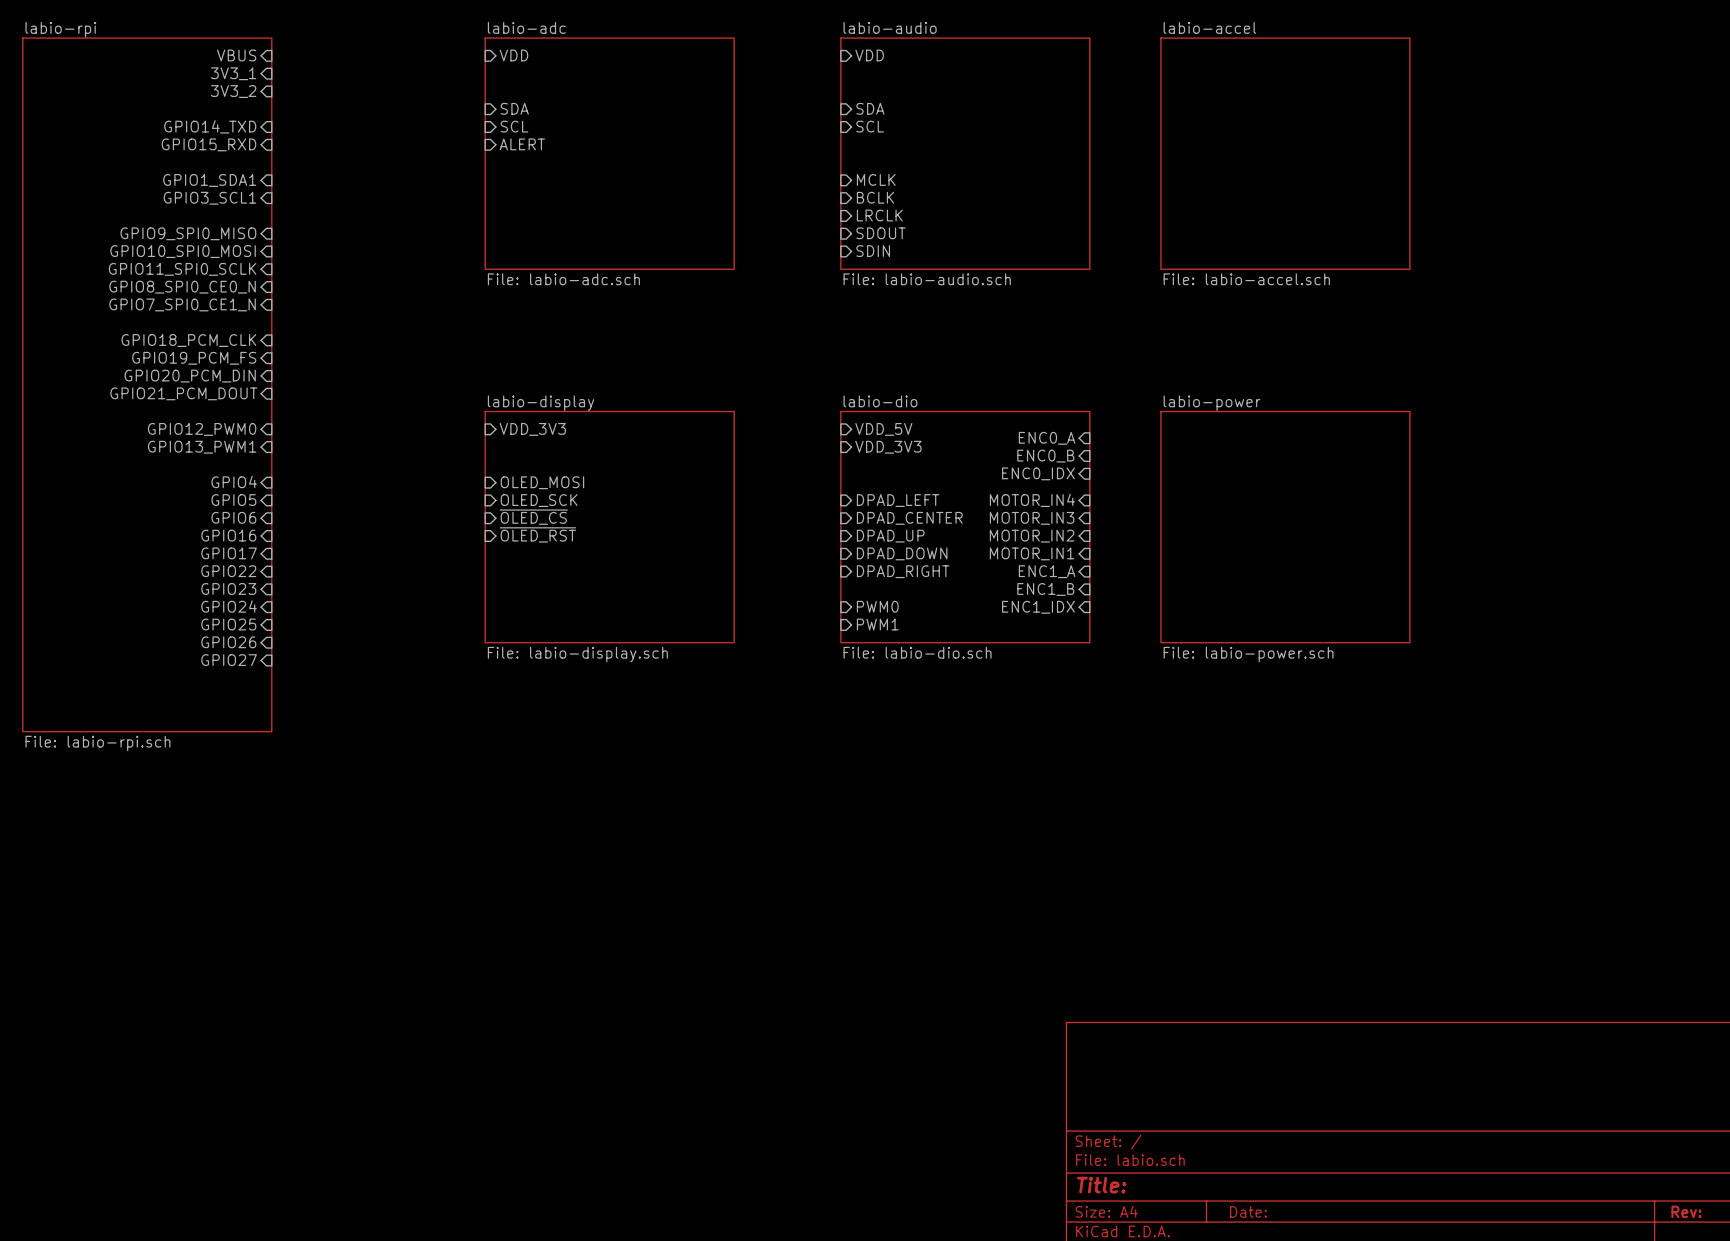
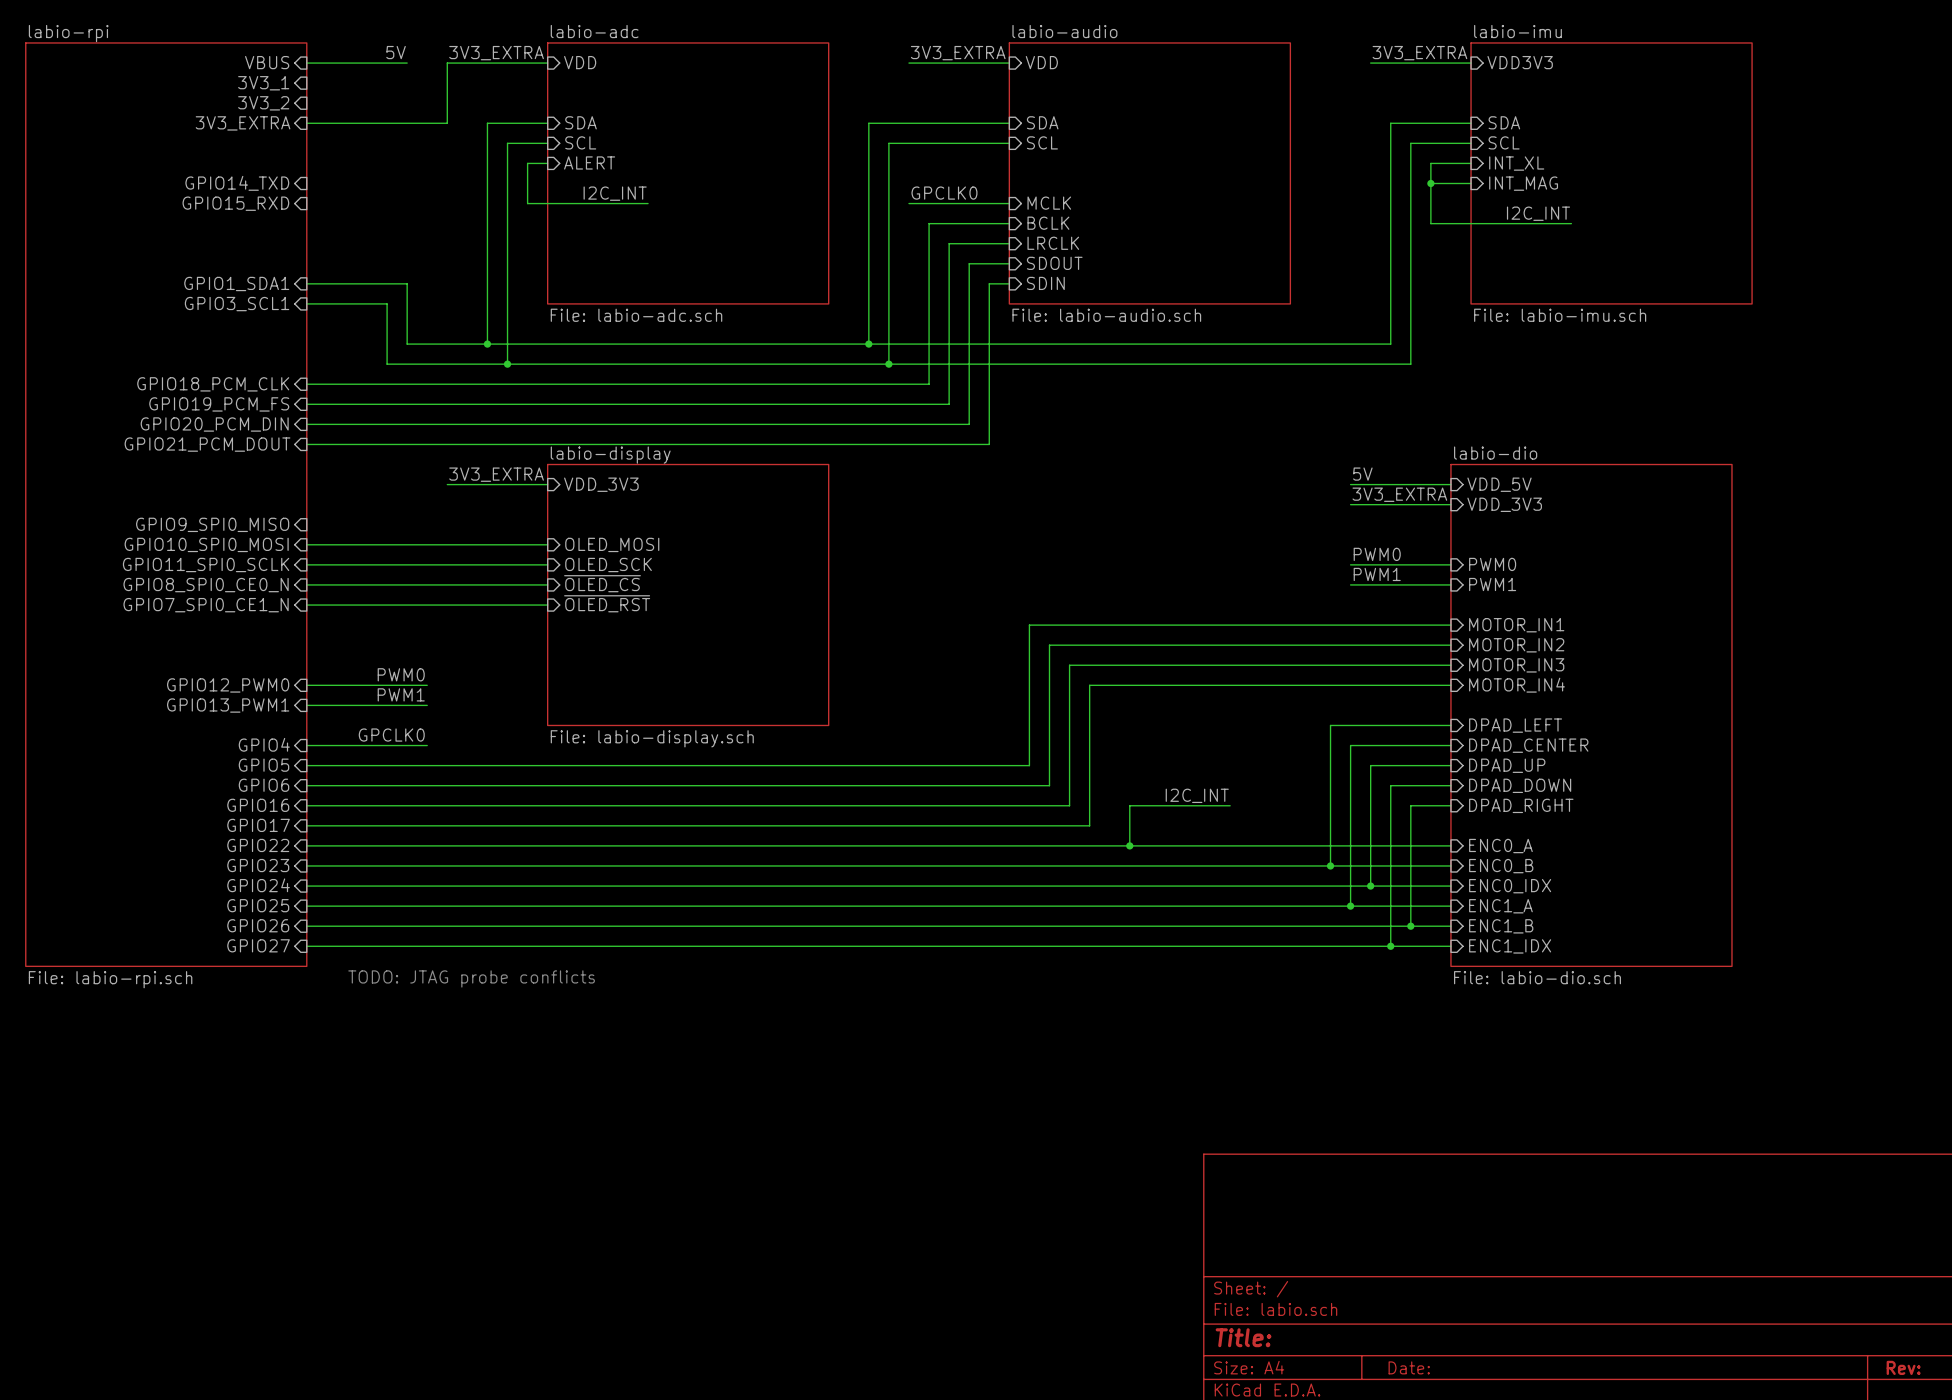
label: none -> 5V (396, 52)
label: none -> 3V3_EXTRA (496, 53)
label: none -> 3V3_EXTRA (958, 53)
label: none -> 3V3_EXTRA (1419, 53)
wire: none -> (306, 63) (407, 63)
wire: none -> (547, 63) (447, 63) (447, 123) (306, 123)
wire: none -> (908, 63) (1009, 63)
sheet pin position: VDD (869, 55) -> VDD (1041, 62)
wire: none -> (1370, 63) (1471, 63)
sheet pin: none -> VDD3V3 (1520, 62)
sheet pin position: SDA (870, 108) -> SDA (1042, 122)
sheet pin: none -> SDA (1504, 122)
sheet pin: none -> 3V3_EXTRA (243, 123)
wire: none -> (547, 123) (487, 123) (487, 344)
wire: none -> (1009, 123) (868, 123) (868, 344)
wire: none -> (1471, 123) (1390, 123) (1390, 344) (407, 344) (407, 283) (306, 283)
sheet pin position: GPIO14_TXD (210, 126) -> GPIO14_TXD (237, 183)
wire: none -> (547, 143) (507, 143) (507, 364)
sheet pin position: SCL (870, 126) -> SCL (1042, 142)
wire: none -> (1009, 143) (888, 143) (888, 364)
wire: none -> (1471, 143) (1410, 143) (1410, 364) (387, 364) (387, 303) (306, 303)
sheet pin: none -> SCL (1504, 142)
sheet pin: GPIO15_RXD (208, 144) -> none
wire: none -> (547, 163) (527, 163) (527, 203) (648, 203)
wire: none -> (1471, 163) (1430, 163) (1430, 223) (1571, 223)
sheet pin: none -> INT_XL (1516, 163)
sheet labio-audio position: (965, 153) -> (1149, 173)
sheet labio-accel: File: labio-accel.sch (1285, 153) -> none
sheet labio-imu: none -> File: labio-imu.sch (1611, 173)
wire: none -> (1430, 183) (1471, 183)
junction: none -> (1430, 183)
sheet pin: none -> INT_MAG (1523, 183)
label: none -> I2C_INT (615, 193)
label: none -> GPCLK0 (944, 193)
sheet pin position: MCLK (876, 179) -> MCLK (1049, 203)
sheet pin: GPIO1_SDA1 (209, 180) -> GPIO15_RXD (235, 203)
wire: none -> (908, 203) (1009, 203)
label: none -> I2C_INT (1538, 213)
sheet pin position: BCLK (875, 197) -> BCLK (1048, 223)
sheet pin: GPIO3_SCL1 (209, 198) -> none
wire: none -> (1009, 223) (929, 223) (929, 384) (306, 384)
sheet pin position: LRCLK (879, 215) -> LRCLK (1053, 243)
wire: none -> (1009, 243) (949, 243) (949, 404) (306, 404)
sheet pin: GPIO9_SPI0_MISO (188, 233) -> none
sheet pin position: SDOUT (881, 233) -> SDOUT (1054, 263)
wire: none -> (1009, 263) (969, 263) (969, 424) (306, 424)
sheet pin: GPIO10_SPI0_MOSI (183, 251) -> GPIO1_SDA1 (236, 283)
sheet pin position: SDIN (873, 251) -> SDIN (1045, 283)
wire: none -> (1009, 283) (989, 283) (989, 444) (306, 444)
sheet pin: GPIO11_SPI0_SCLK (182, 269) -> GPIO3_SCL1 (237, 304)
sheet pin: GPIO8_SPI0_CE0_N (182, 287) -> none
sheet pin: GPIO7_SPI0_CE1_N (182, 304) -> none
junction: none -> (487, 344)
junction: none -> (868, 344)
junction: none -> (507, 364)
junction: none -> (888, 364)
sheet labio-rpi: File: labio-rpi.sch (147, 384) -> none
label: none -> 3V3_EXTRA (496, 474)
label: none -> 5V (1362, 474)
sheet pin: GPIO12_PWM0 (202, 429) -> none
wire: none -> (447, 484) (547, 484)
sheet pin: VDD_5V (883, 429) -> none
wire: none -> (1350, 484) (1450, 484)
sheet pin: none -> VDD_5V (1499, 484)
sheet pin: ENC0_A (1047, 438) -> none
label: none -> 3V3_EXTRA (1399, 494)
sheet labio-rpi: none -> File: labio-rpi.sch (166, 504)
sheet pin: GPIO13_PWM1 (202, 447) -> none
sheet pin: VDD_3V3 (888, 447) -> none
wire: none -> (1350, 504) (1450, 504)
sheet pin: none -> VDD_3V3 (1504, 504)
sheet pin: ENC0_B (1045, 456) -> none
sheet pin: none -> GPIO9_SPI0_MISO (212, 524)
sheet pin: ENC0_IDX (1038, 473) -> none
sheet pin: GPIO4 (234, 482) -> GPIO10_SPI0_MOSI (206, 544)
wire: none -> (306, 544) (547, 544)
label: none -> PWM0 (1377, 554)
sheet pin: GPIO5 (233, 500) -> GPIO11_SPI0_SCLK (206, 565)
wire: none -> (306, 564) (547, 564)
sheet pin: DPAD_LEFT (898, 500) -> none
sheet pin: MOTOR_IN4 (1032, 500) -> none
wire: none -> (1350, 564) (1450, 564)
sheet pin: none -> PWM0 (1492, 564)
label: none -> PWM1 (1377, 574)
sheet pin: GPIO6 (233, 517) -> GPIO8_SPI0_CE0_N (206, 585)
sheet pin: none -> PWM1 (1492, 584)
wire: none -> (306, 584) (547, 584)
sheet pin: DPAD_CENTER (909, 518) -> none
sheet pin: MOTOR_IN3 (1032, 518) -> none
wire: none -> (1350, 584) (1450, 584)
sheet labio-dio: File: labio-dio.sch (965, 527) -> none
sheet labio-power: File: labio-power.sch (1285, 527) -> none
sheet pin: GPIO16 (228, 535) -> GPIO7_SPI0_CE1_N (206, 605)
wire: none -> (306, 605) (547, 605)
sheet pin: DPAD_UP (890, 536) -> none
sheet pin: MOTOR_IN2 (1032, 536) -> none
sheet pin: GPIO17 (229, 553) -> none
sheet pin: DPAD_DOWN (902, 553) -> none
sheet pin: MOTOR_IN1 (1032, 553) -> none
wire: none -> (1450, 625) (1029, 625) (1029, 765) (306, 765)
sheet pin: none -> MOTOR_IN1 (1516, 625)
sheet pin: GPIO22 (228, 571) -> none
sheet pin: DPAD_RIGHT (903, 571) -> none
sheet pin: ENC1_A (1047, 571) -> none
wire: none -> (1450, 645) (1049, 645) (1049, 785) (306, 785)
sheet pin: none -> MOTOR_IN2 (1516, 645)
sheet pin: GPIO23 (228, 588) -> none
sheet pin: ENC1_B (1045, 589) -> none
wire: none -> (1450, 665) (1069, 665) (1069, 805) (306, 805)
sheet pin: none -> MOTOR_IN3 (1516, 665)
label: none -> PWM0 (401, 674)
sheet pin: GPIO24 (229, 606) -> GPIO12_PWM0 (228, 685)
sheet pin: PWM0 (877, 606) -> none
wire: none -> (306, 685) (427, 685)
sheet pin: ENC1_IDX (1038, 607) -> none
wire: none -> (1450, 685) (1089, 685) (1089, 825) (306, 825)
sheet pin: none -> MOTOR_IN4 (1516, 685)
label: none -> PWM1 (401, 694)
sheet pin: GPIO25 (228, 624) -> GPIO13_PWM1 (228, 705)
wire: none -> (306, 705) (427, 705)
sheet pin: PWM1 (877, 624) -> none
sheet labio-dio: none -> File: labio-dio.sch (1591, 715)
sheet pin: GPIO26 (228, 642) -> none
wire: none -> (1450, 725) (1330, 725) (1330, 865)
sheet pin: none -> DPAD_LEFT (1515, 725)
label: none -> GPCLK0 (391, 735)
sheet pin: GPIO27 (229, 660) -> GPIO4 (264, 744)
wire: none -> (306, 745) (427, 745)
wire: none -> (1450, 745) (1350, 745) (1350, 906)
sheet pin: none -> DPAD_CENTER (1528, 745)
sheet pin: none -> GPIO5 (263, 765)
wire: none -> (1450, 765) (1370, 765) (1370, 886)
sheet pin: none -> DPAD_UP (1507, 765)
sheet pin: none -> GPIO6 (263, 785)
wire: none -> (1450, 785) (1390, 785) (1390, 946)
sheet pin: none -> DPAD_DOWN (1520, 785)
label: none -> I2C_INT (1197, 795)
sheet pin: none -> GPIO16 (258, 805)
wire: none -> (1230, 805) (1129, 805) (1129, 845)
wire: none -> (1450, 805) (1410, 805) (1410, 926)
sheet pin: none -> DPAD_RIGHT (1521, 805)
sheet pin: none -> GPIO17 (258, 825)
sheet pin: none -> GPIO22 (258, 845)
wire: none -> (306, 845) (1450, 845)
junction: none -> (1129, 845)
sheet pin: none -> ENC0_A (1500, 846)
sheet pin: none -> GPIO23 (258, 865)
wire: none -> (306, 865) (1450, 865)
junction: none -> (1330, 865)
sheet pin: none -> ENC0_B (1501, 866)
sheet pin: none -> GPIO24 (258, 885)
wire: none -> (306, 886) (1450, 886)
junction: none -> (1370, 886)
sheet pin: none -> ENC0_IDX (1510, 886)
sheet pin: none -> GPIO25 (258, 905)
wire: none -> (306, 906) (1450, 906)
junction: none -> (1350, 906)
sheet pin: none -> ENC1_A (1500, 906)
sheet pin: none -> GPIO26 (258, 925)
wire: none -> (306, 926) (1450, 926)
junction: none -> (1410, 926)
sheet pin: none -> ENC1_B (1501, 926)
sheet pin: none -> GPIO27 (258, 945)
wire: none -> (306, 946) (1450, 946)
junction: none -> (1390, 946)
sheet pin: none -> ENC1_IDX (1510, 946)
text: none -> TODO: JTAG probe conflicts (471, 978)

